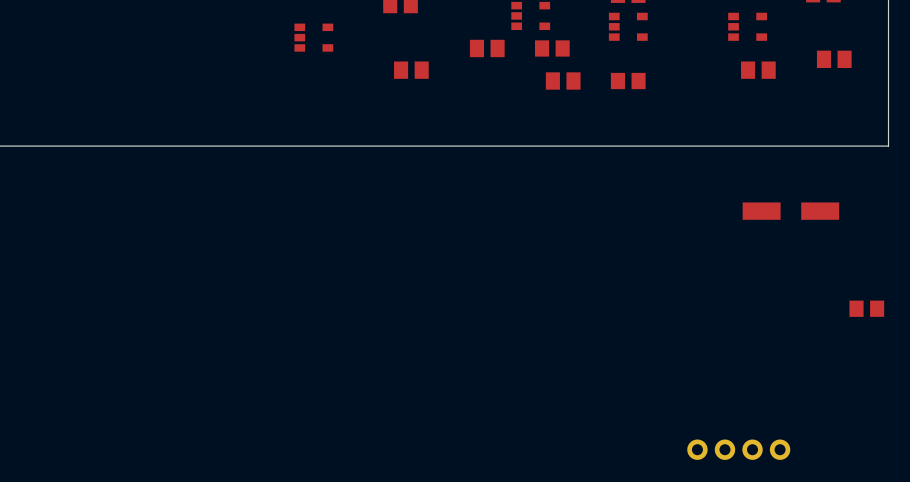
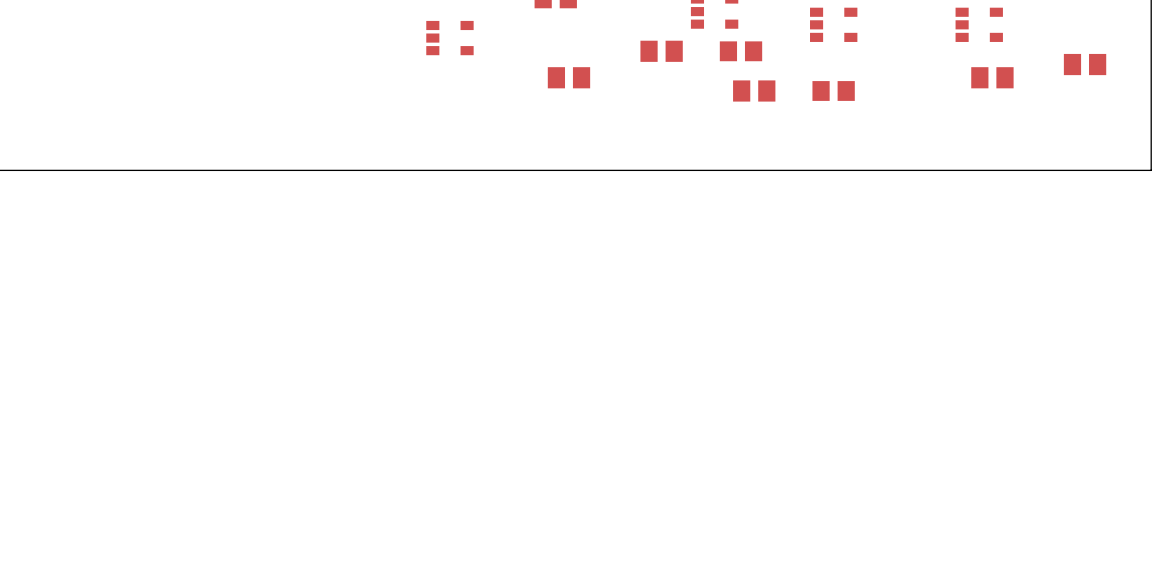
part: (790, 211) -> none
part: (866, 308) -> none
part: (738, 449) -> none

